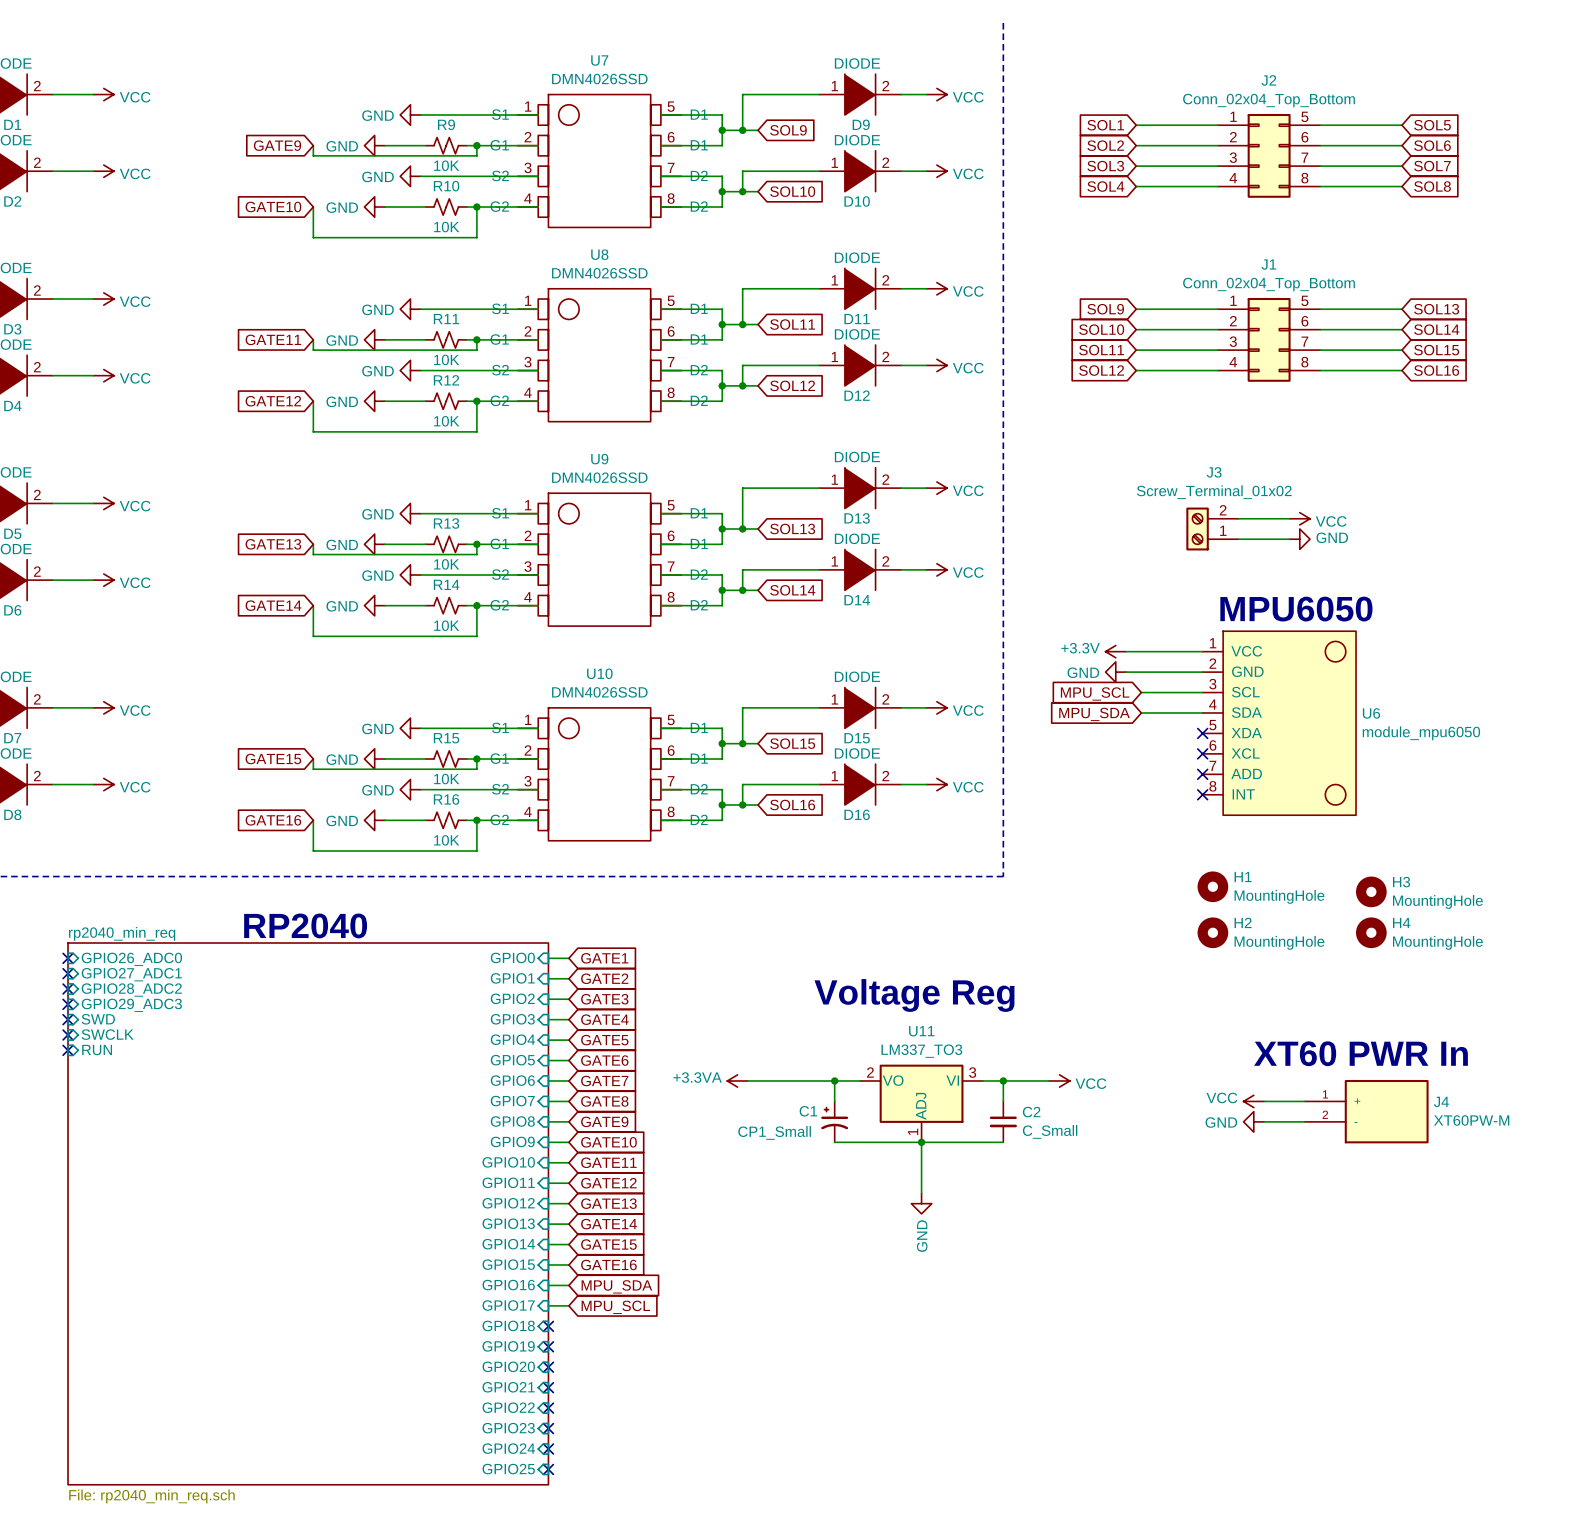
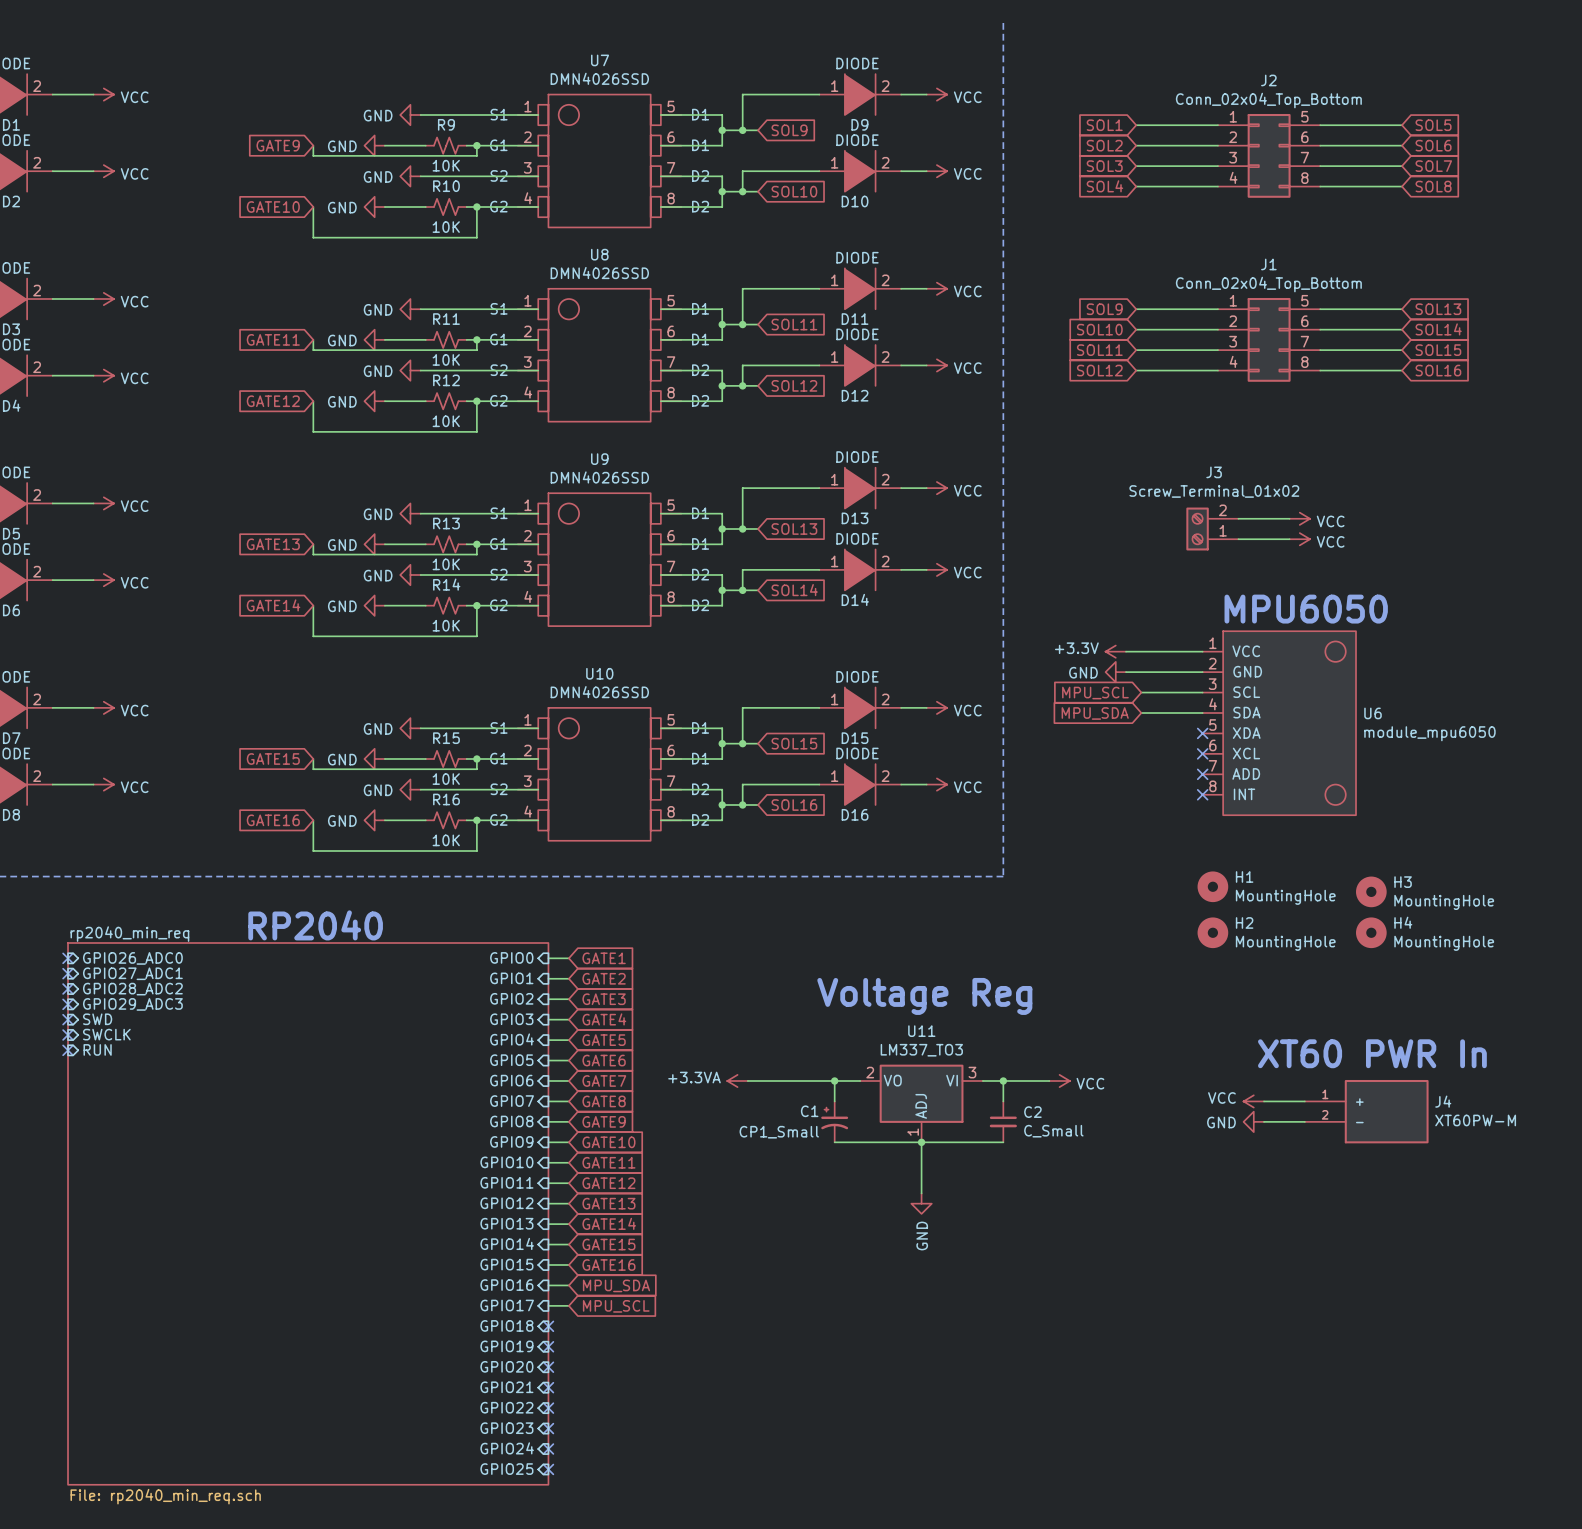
power symbol: GND (1299, 539) -> VCC (1299, 539)

